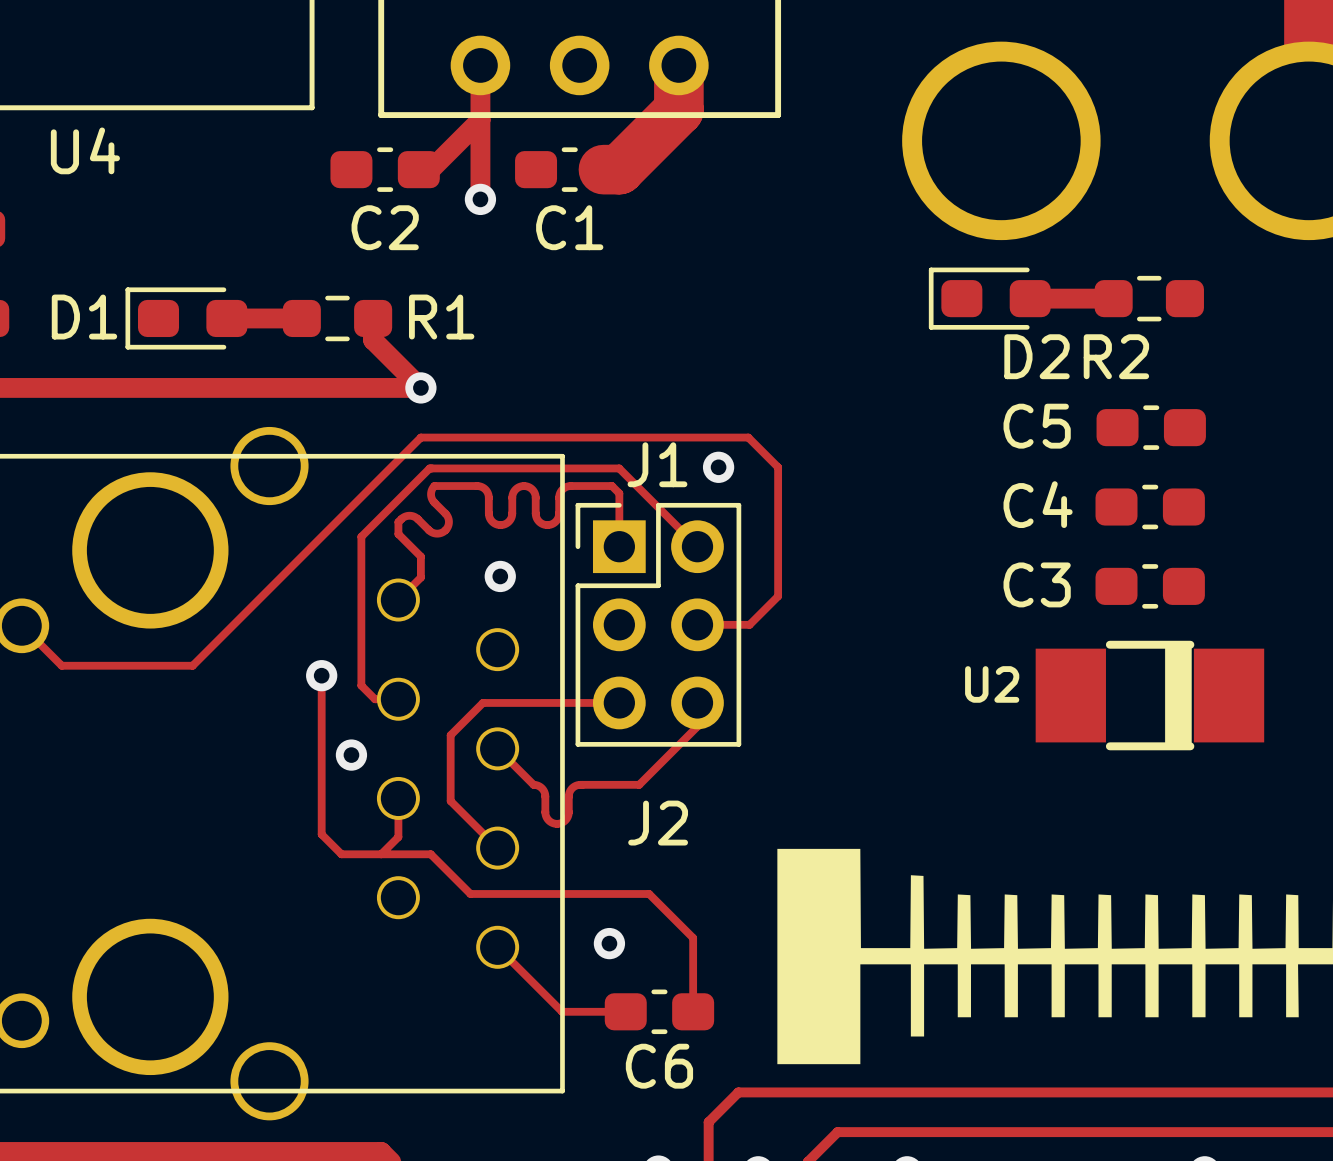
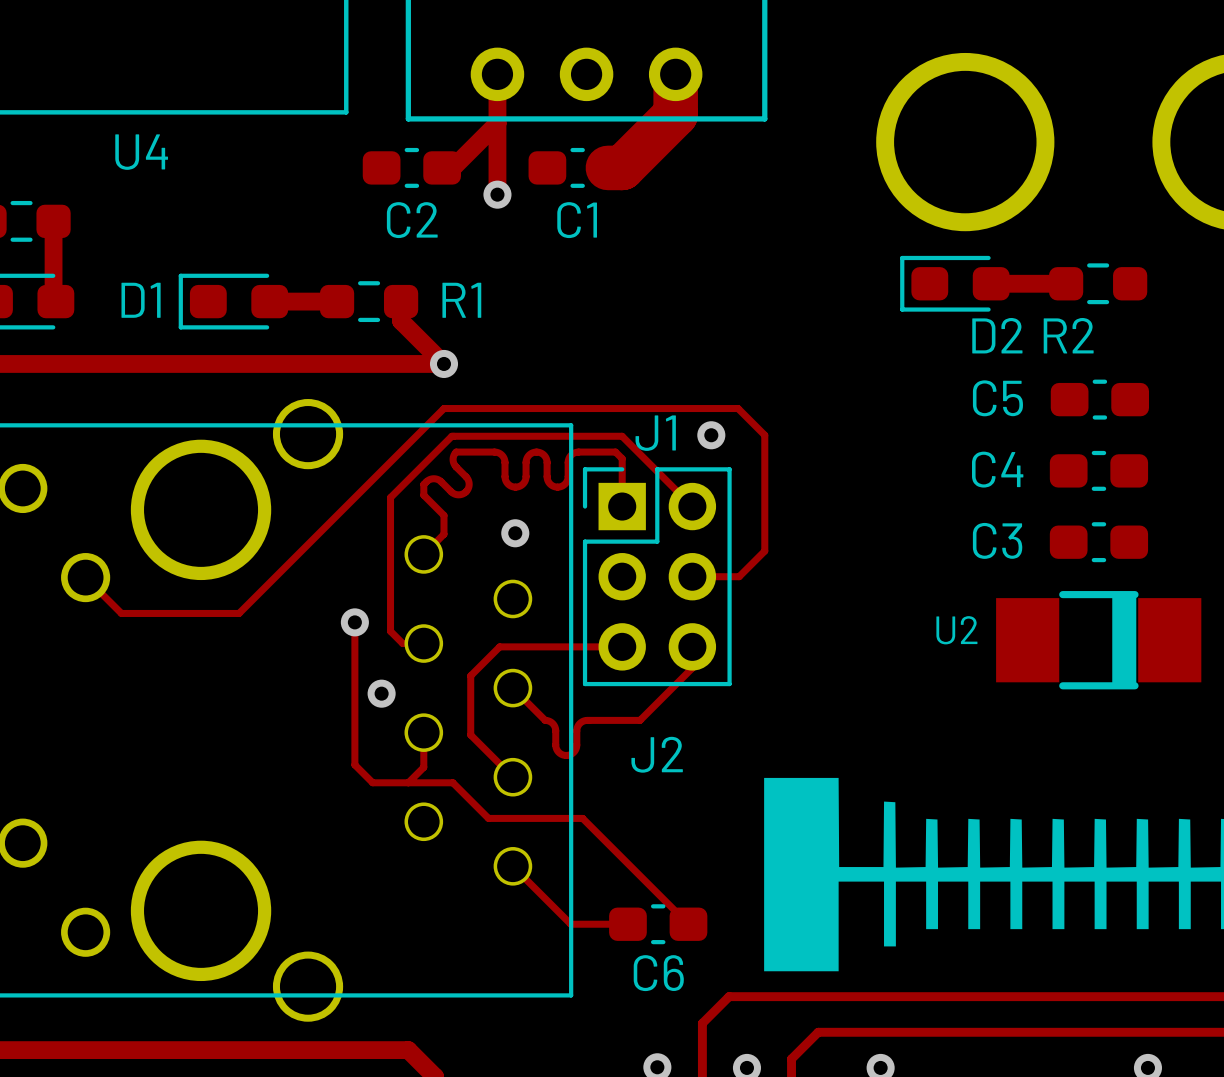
track: (575, 893) (649, 893) (693, 938) (693, 1011) -> (582, 818) (688, 924)
via: (609, 943) -> none

